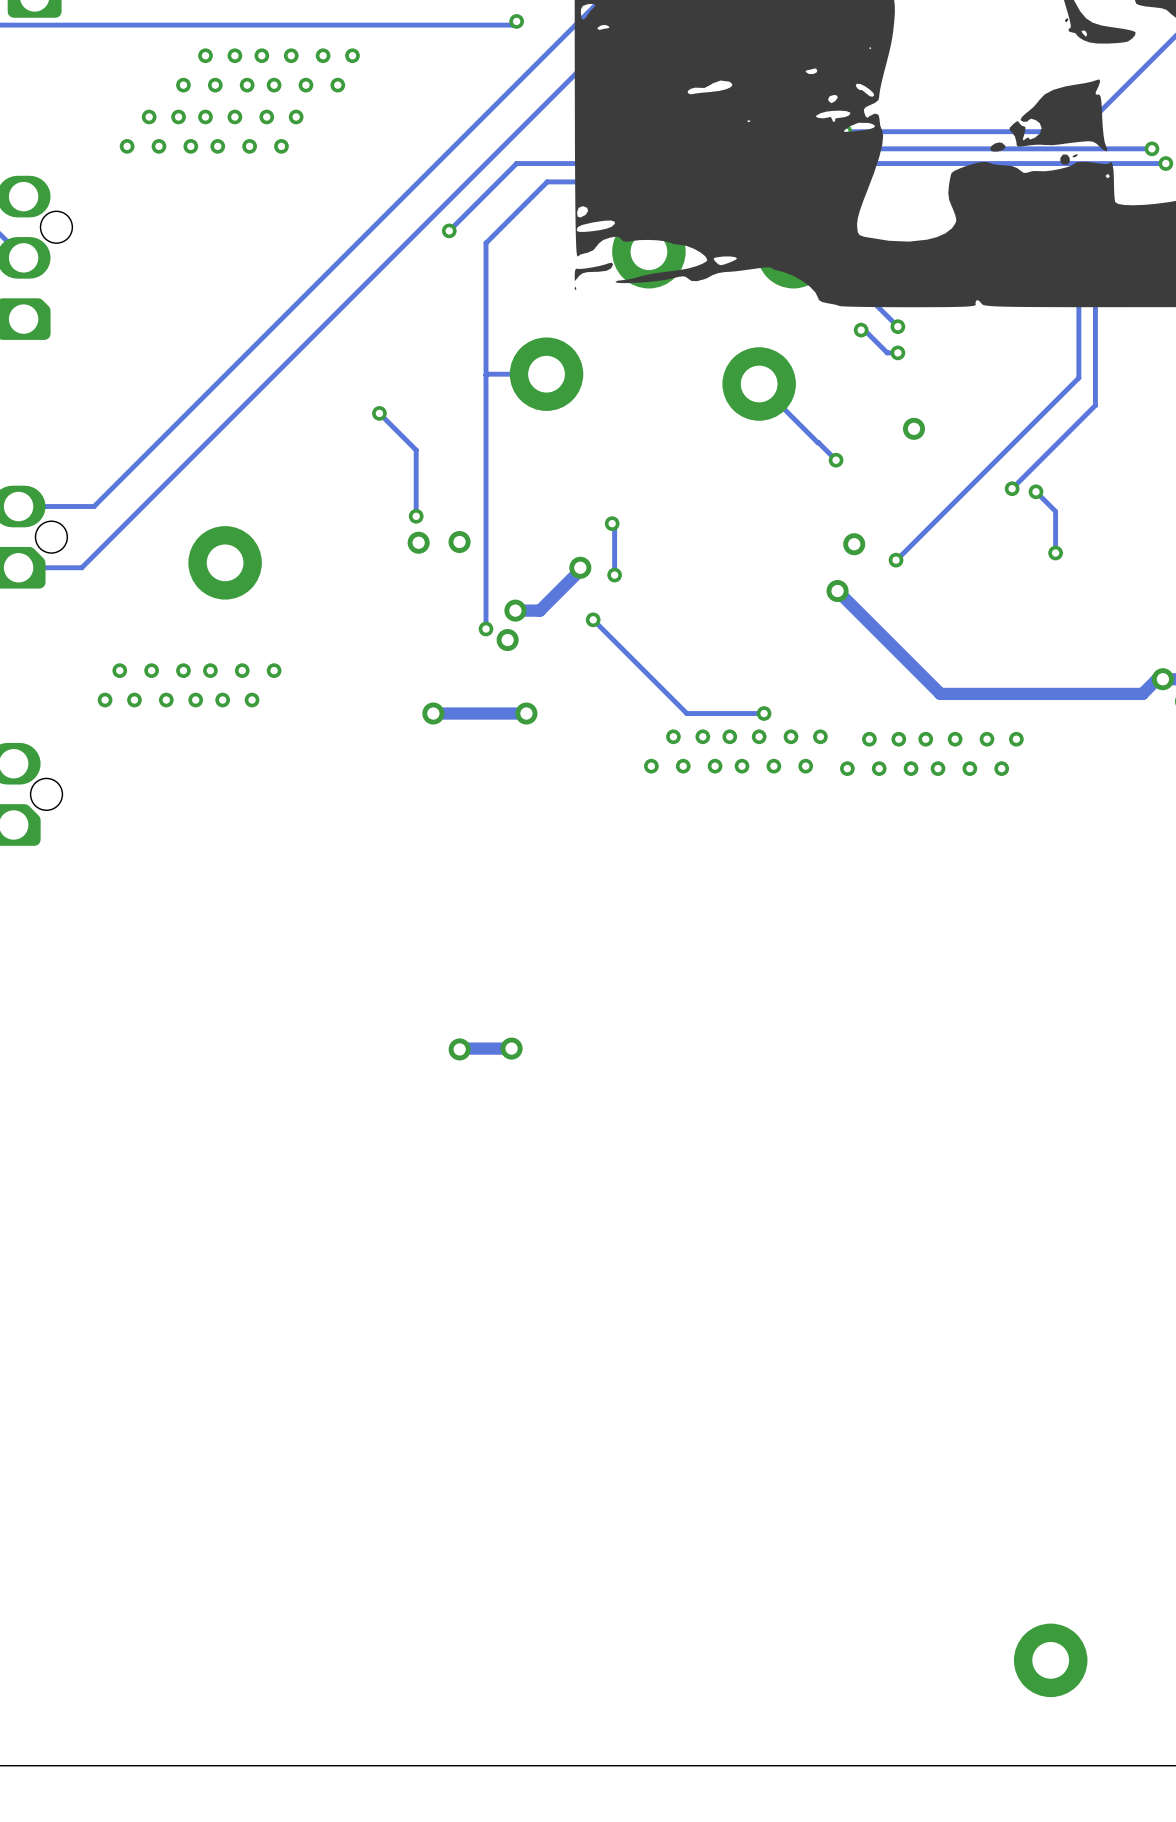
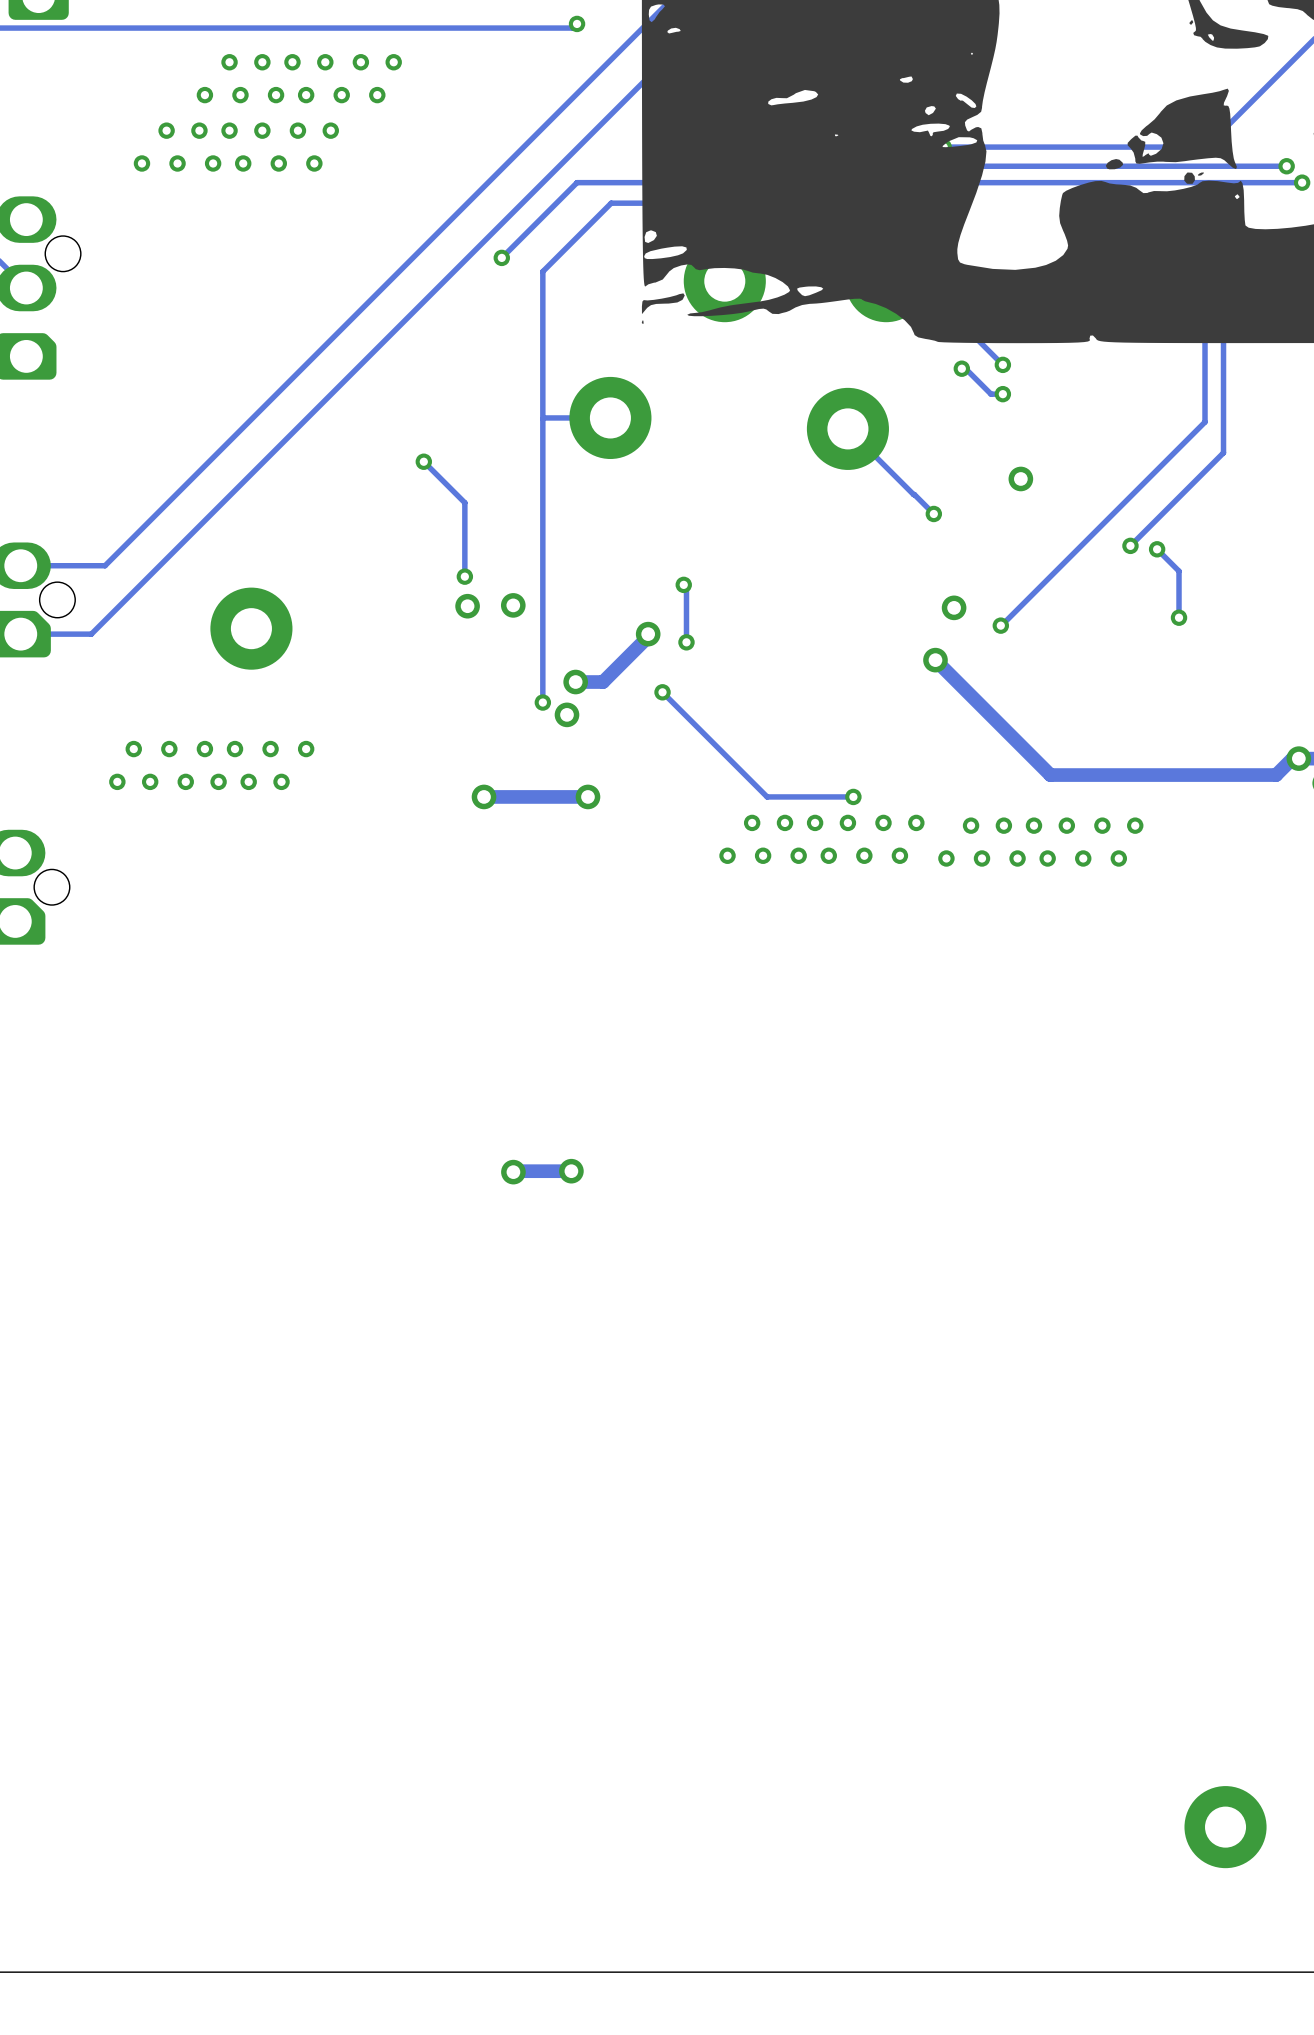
part position: (1050, 1660) -> (1225, 1827)

